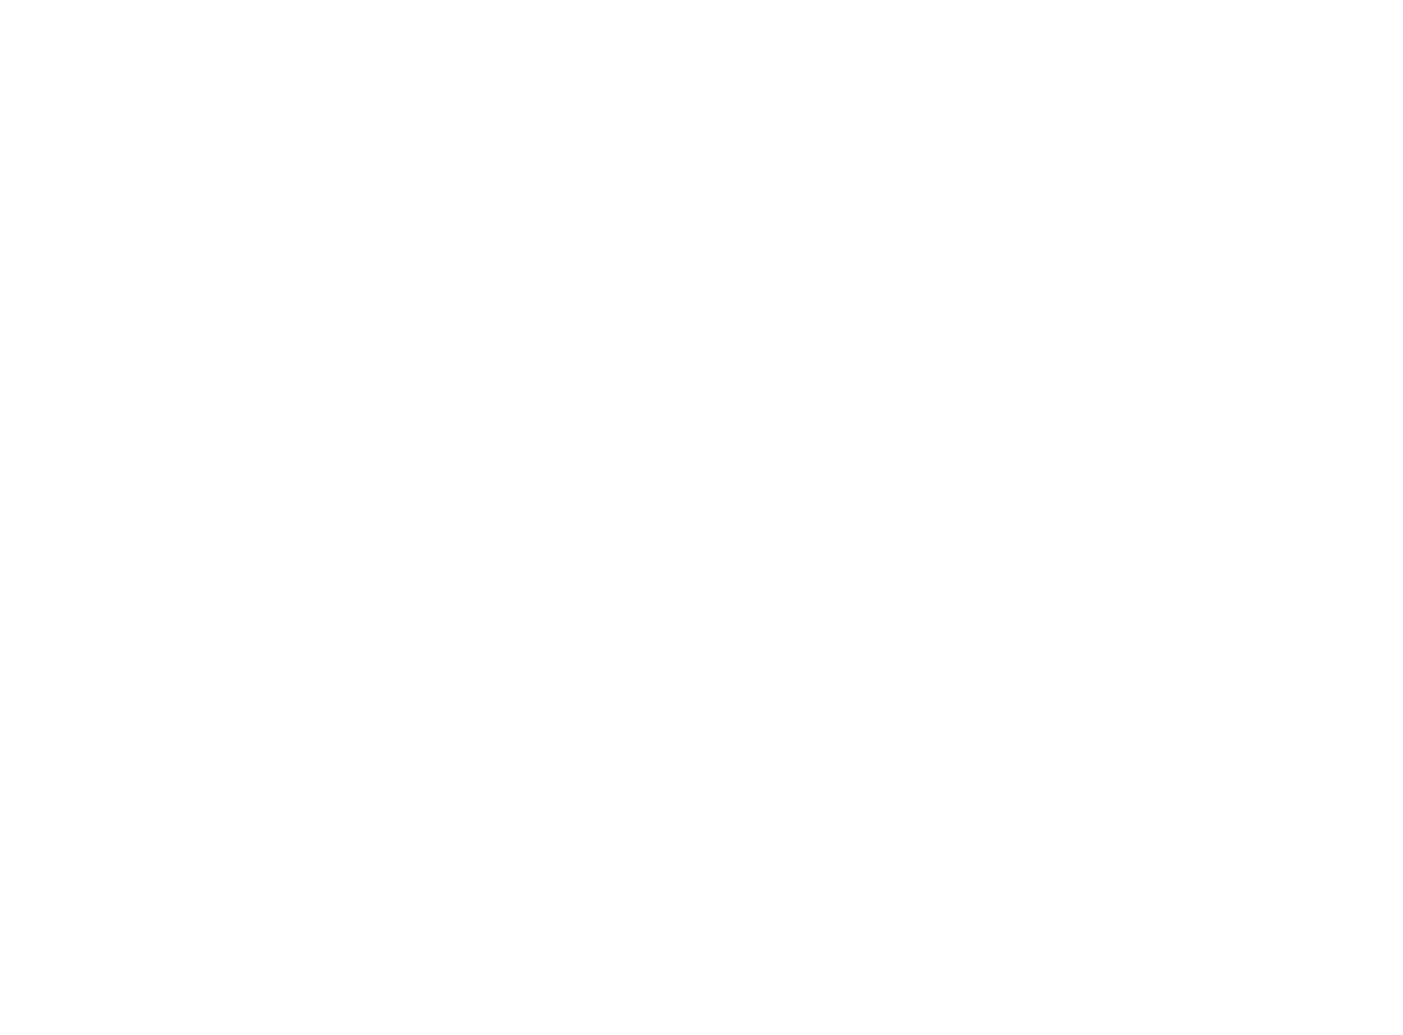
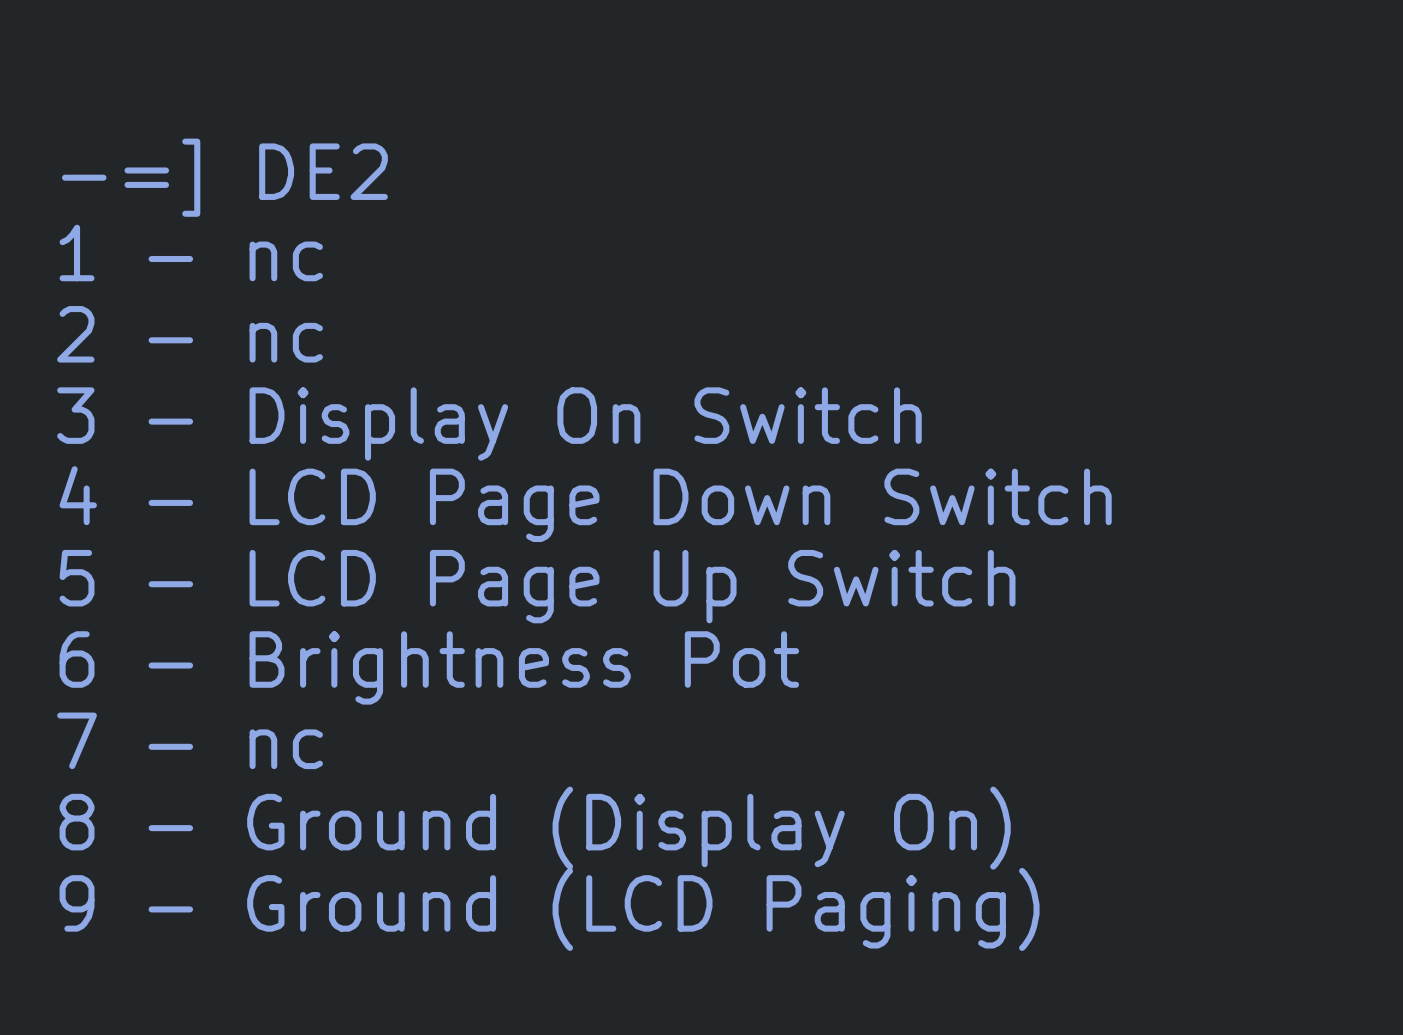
text: none -> -=] DE2 (224, 177)
text: none -> 1 - nc (191, 252)
text: none -> 2 - nc (190, 334)
text: none -> 3 - Display On Switch (489, 424)
text: none -> 4 - LCD Page Down Switch (585, 504)
text: none -> 5 - LCD Page Up Switch (537, 586)
text: none -> 6 - Brightness Pot (429, 667)
text: none -> 7 - nc (190, 740)
text: none -> 8 - Ground (Display On) (535, 828)
text: none -> 9 - Ground (LCD Paging) (549, 909)

